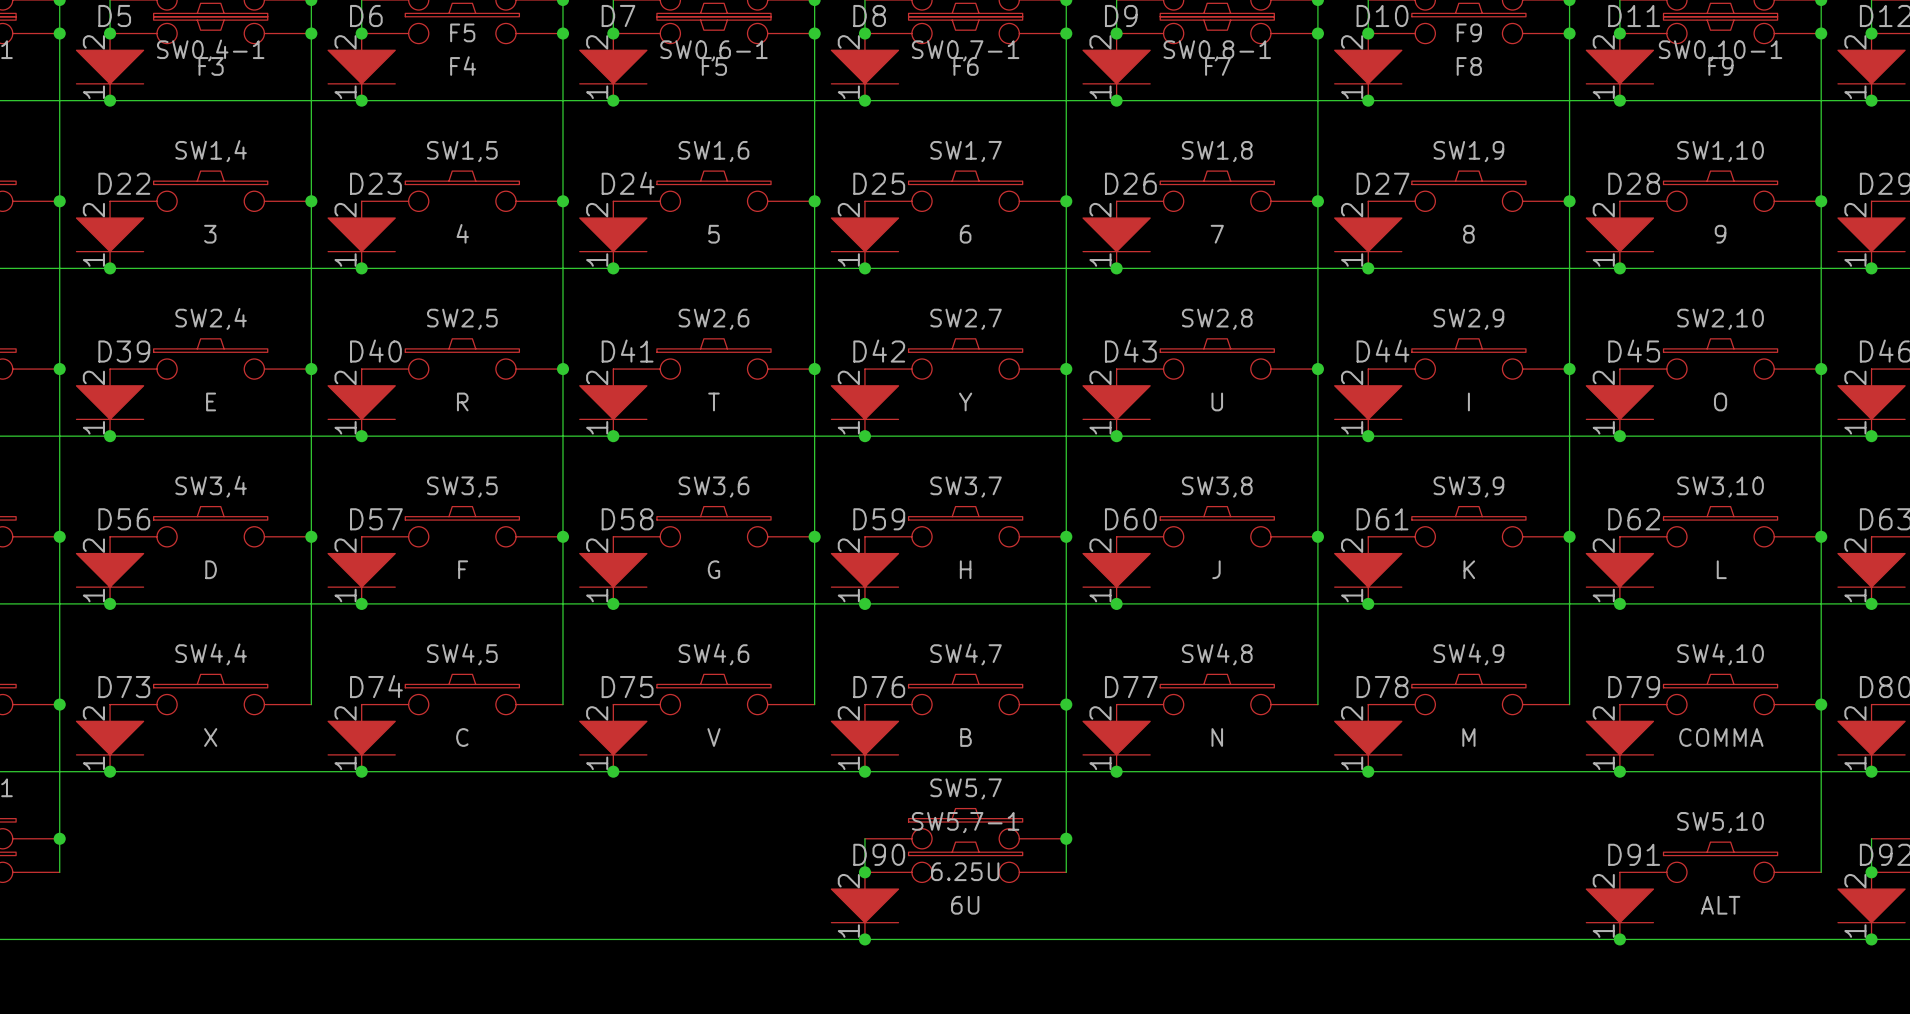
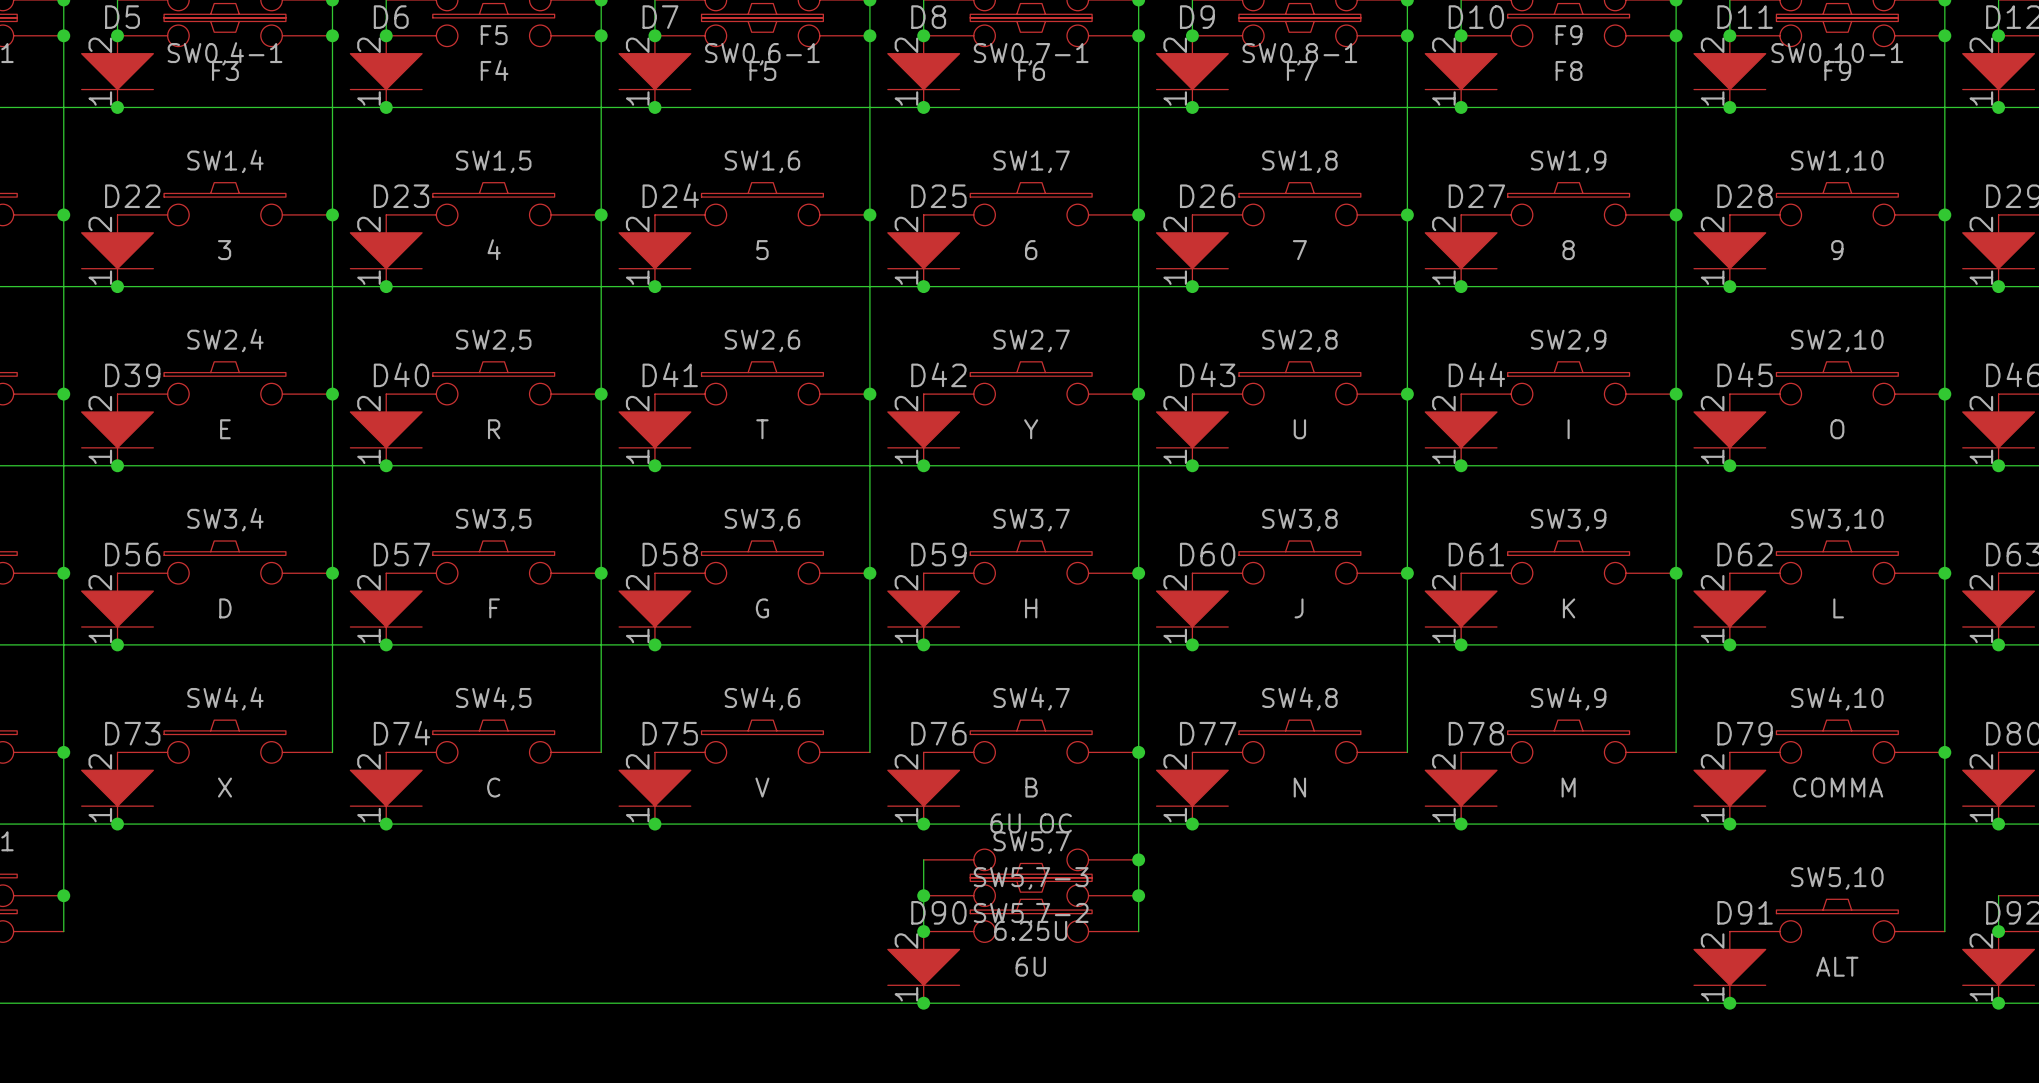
wire: none -> (923, 859) (923, 895)
junction: none -> (1138, 859)
SW5,7-2: none -> 6U OC (1031, 870)
SW5,7-1 name: SW5,7-1 (965, 822) -> SW5,7-3 (1031, 878)
junction: none -> (923, 895)

